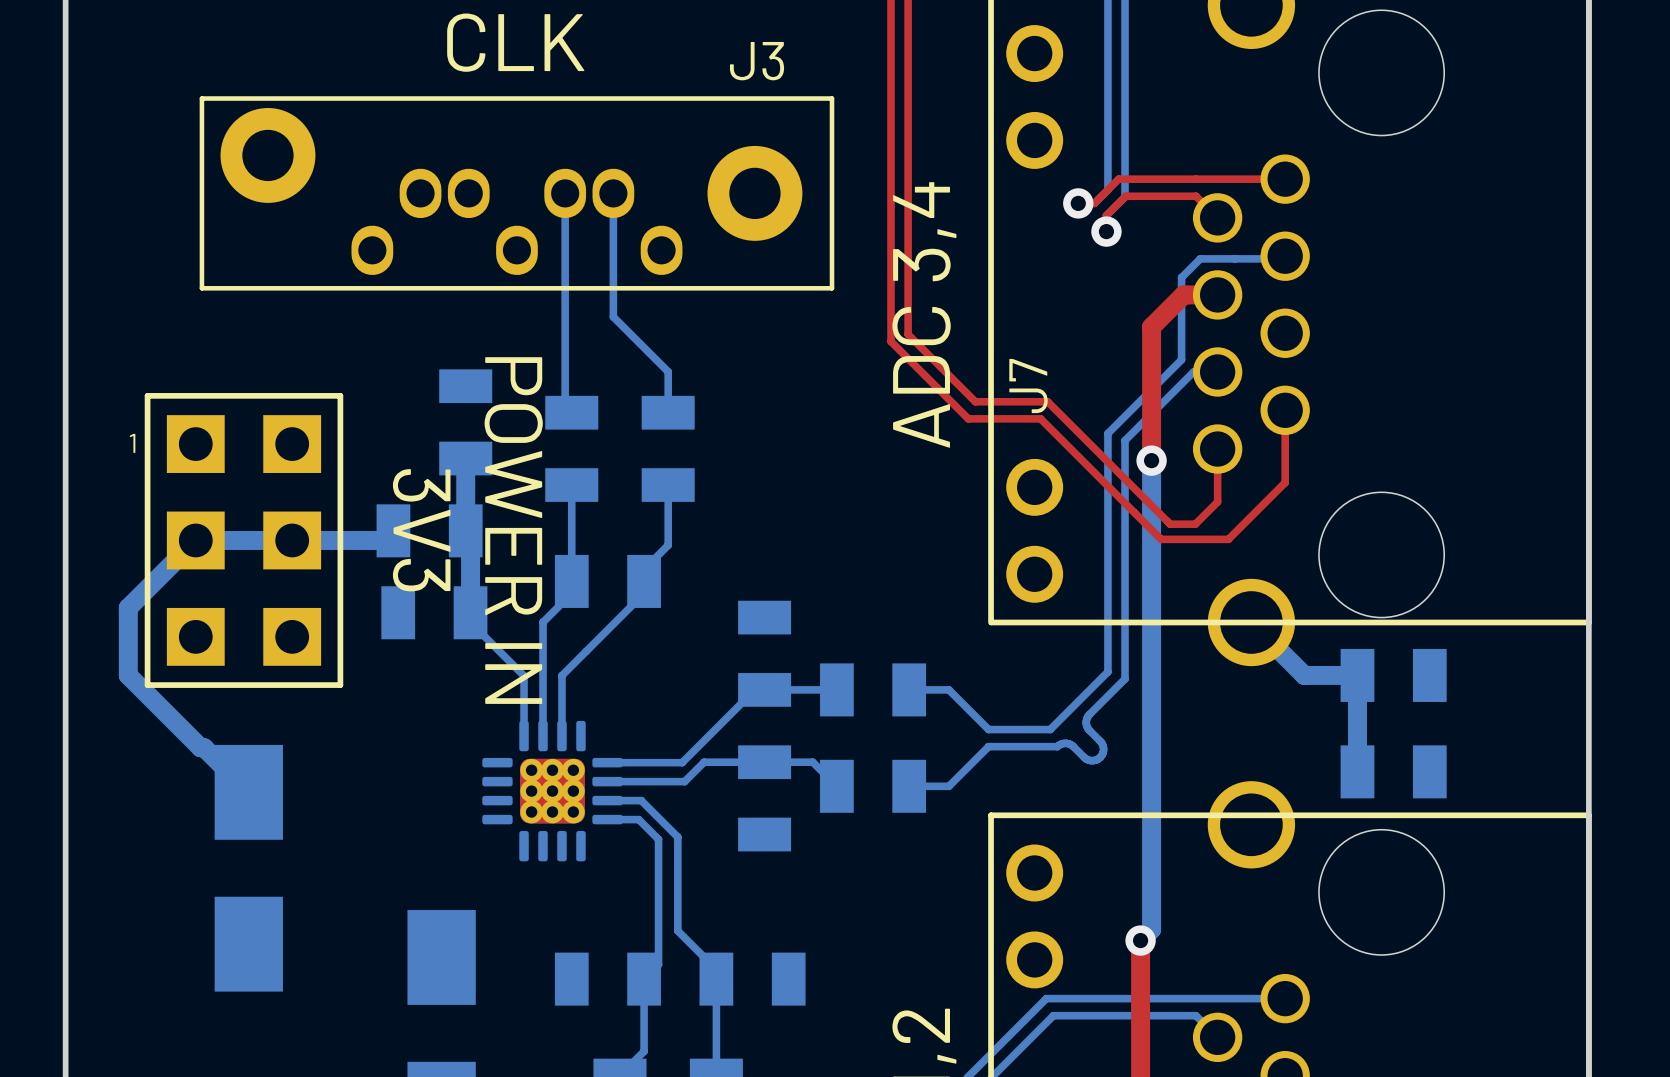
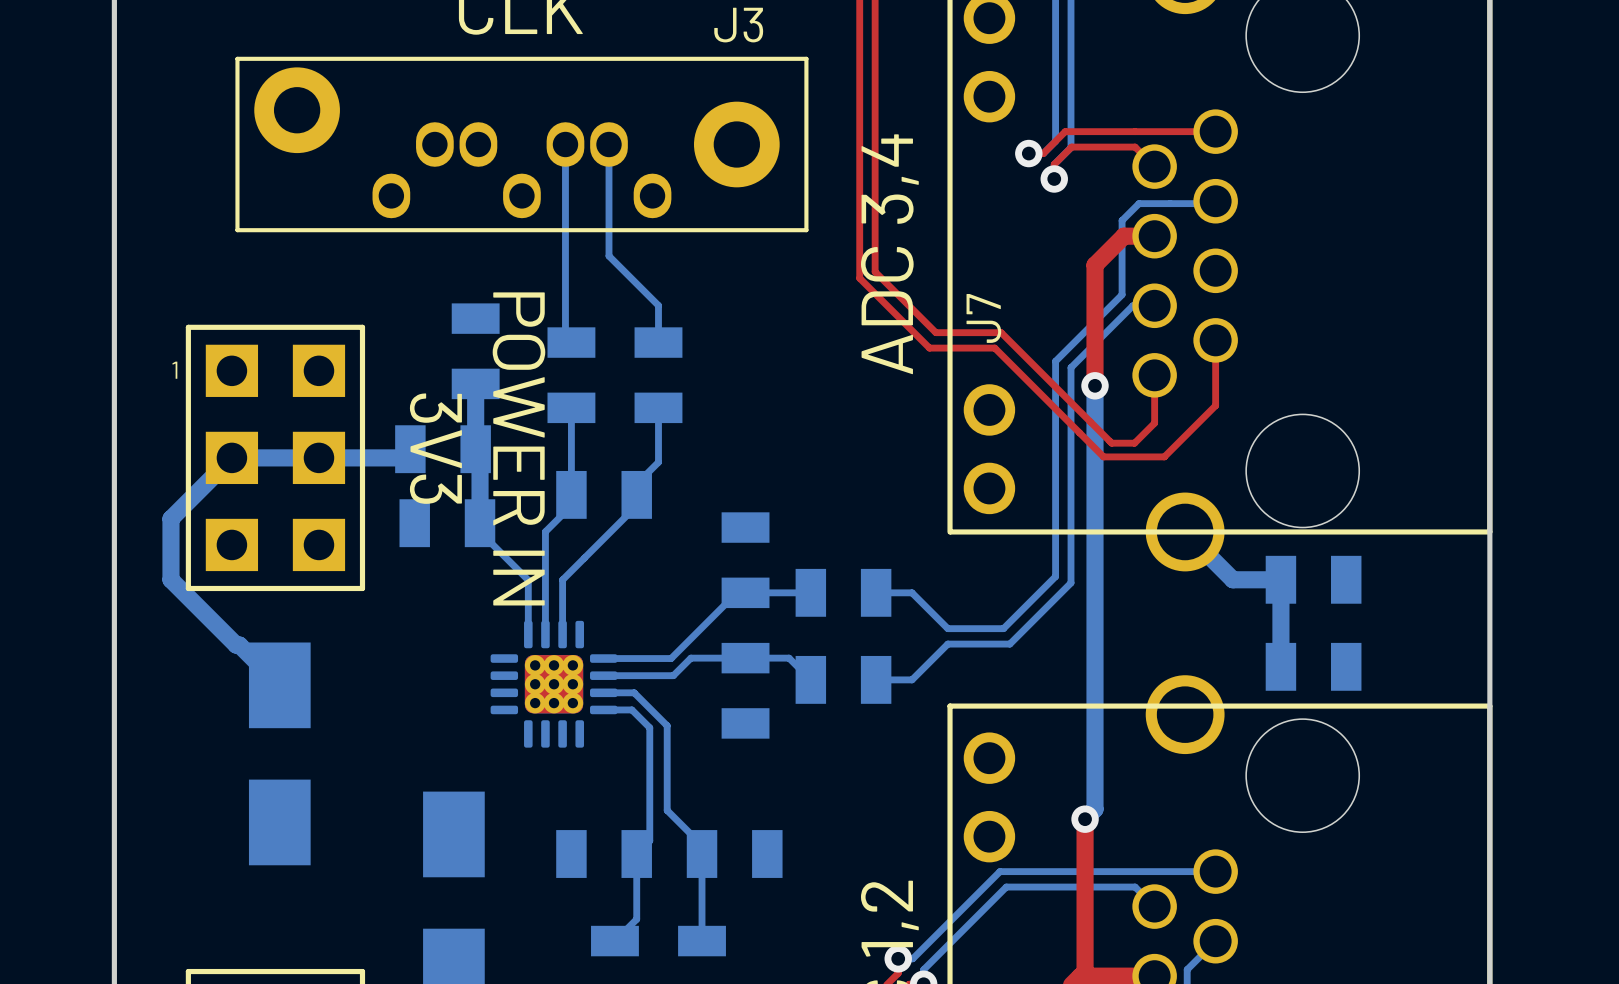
bottom track: (1089, 714) (1086, 721) (1086, 726) (1102, 745) (1103, 750) (1100, 757) (1093, 760) (1088, 760) (1069, 743) (1064, 743) (1057, 746) -> (1038, 614) (1009, 644)

